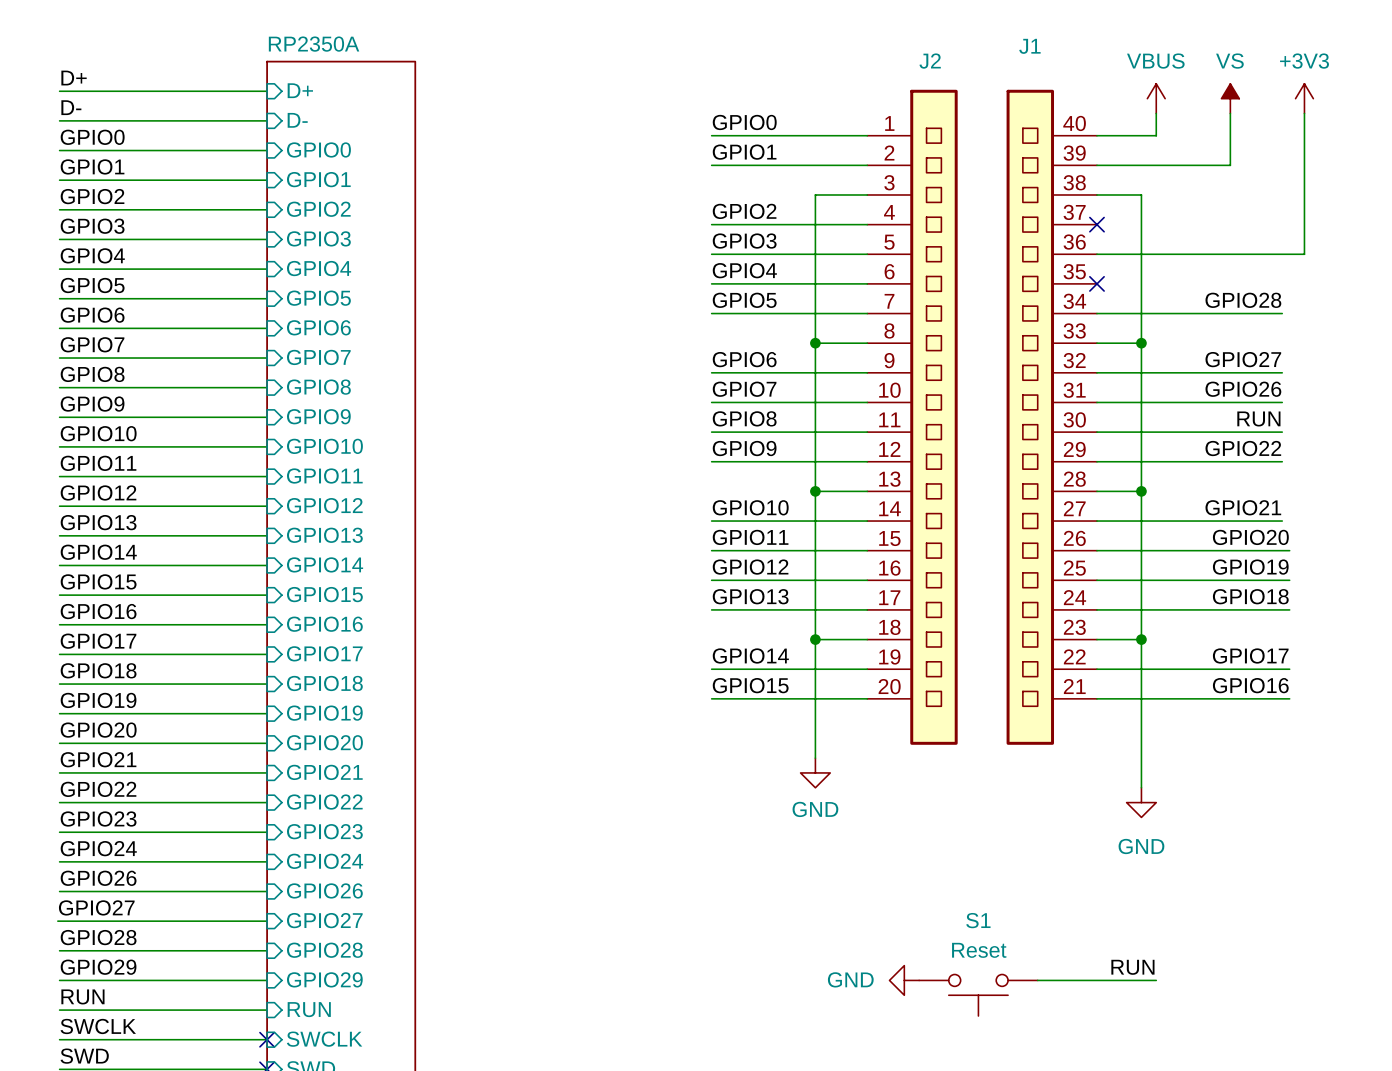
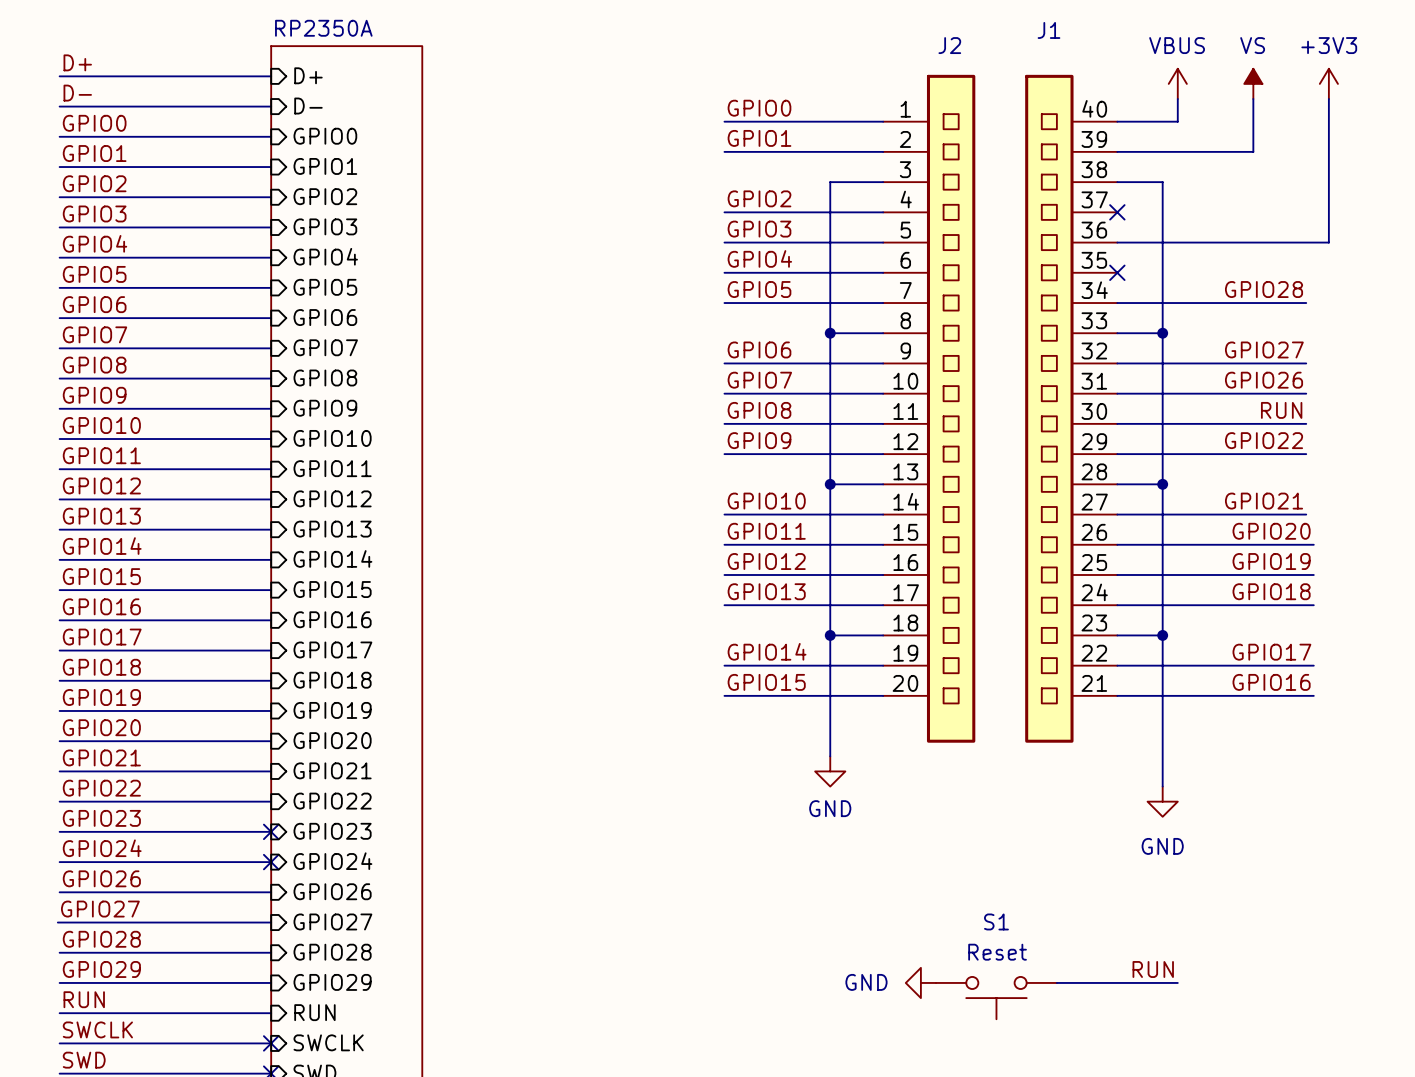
no-connect mark: none -> (271, 831)
no-connect mark: none -> (271, 862)

